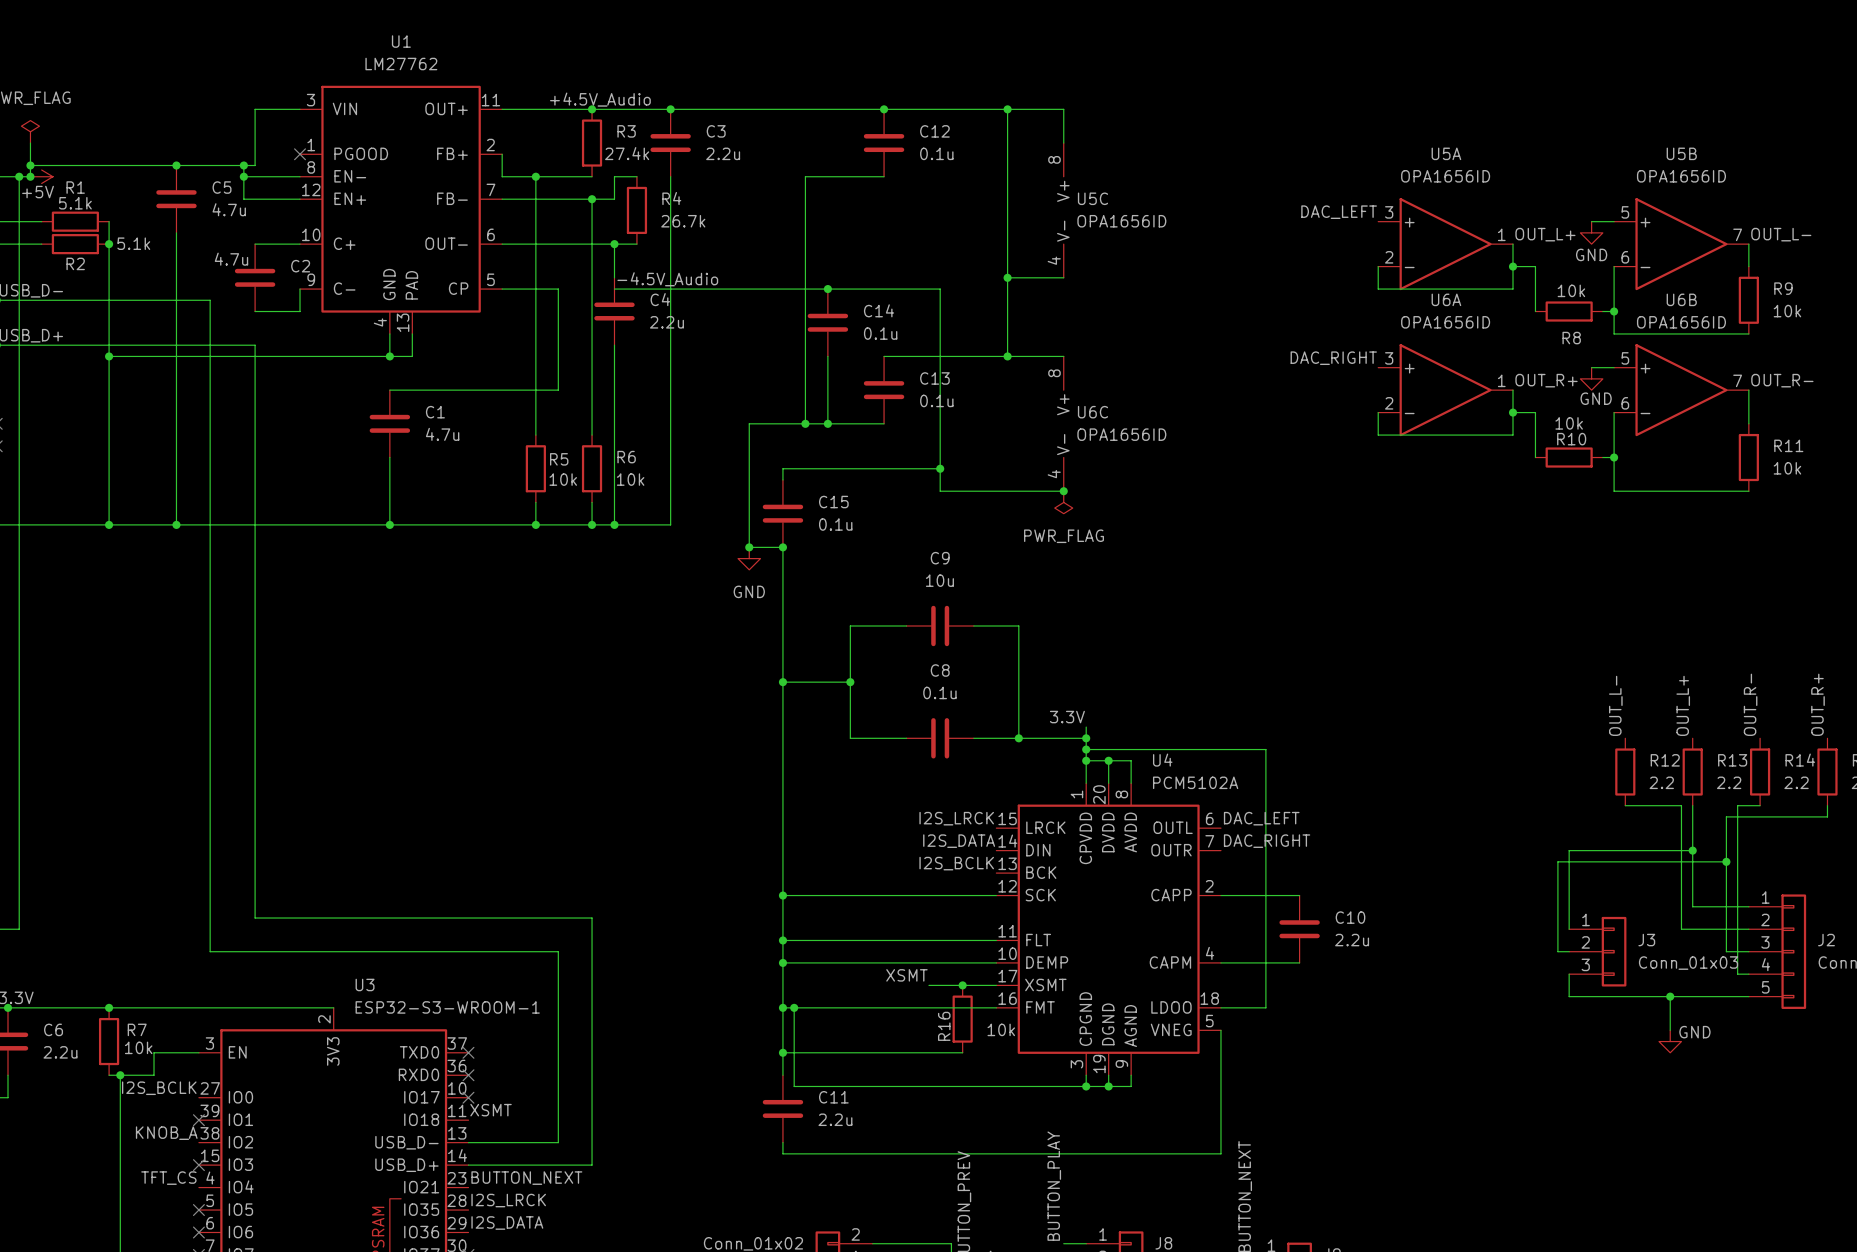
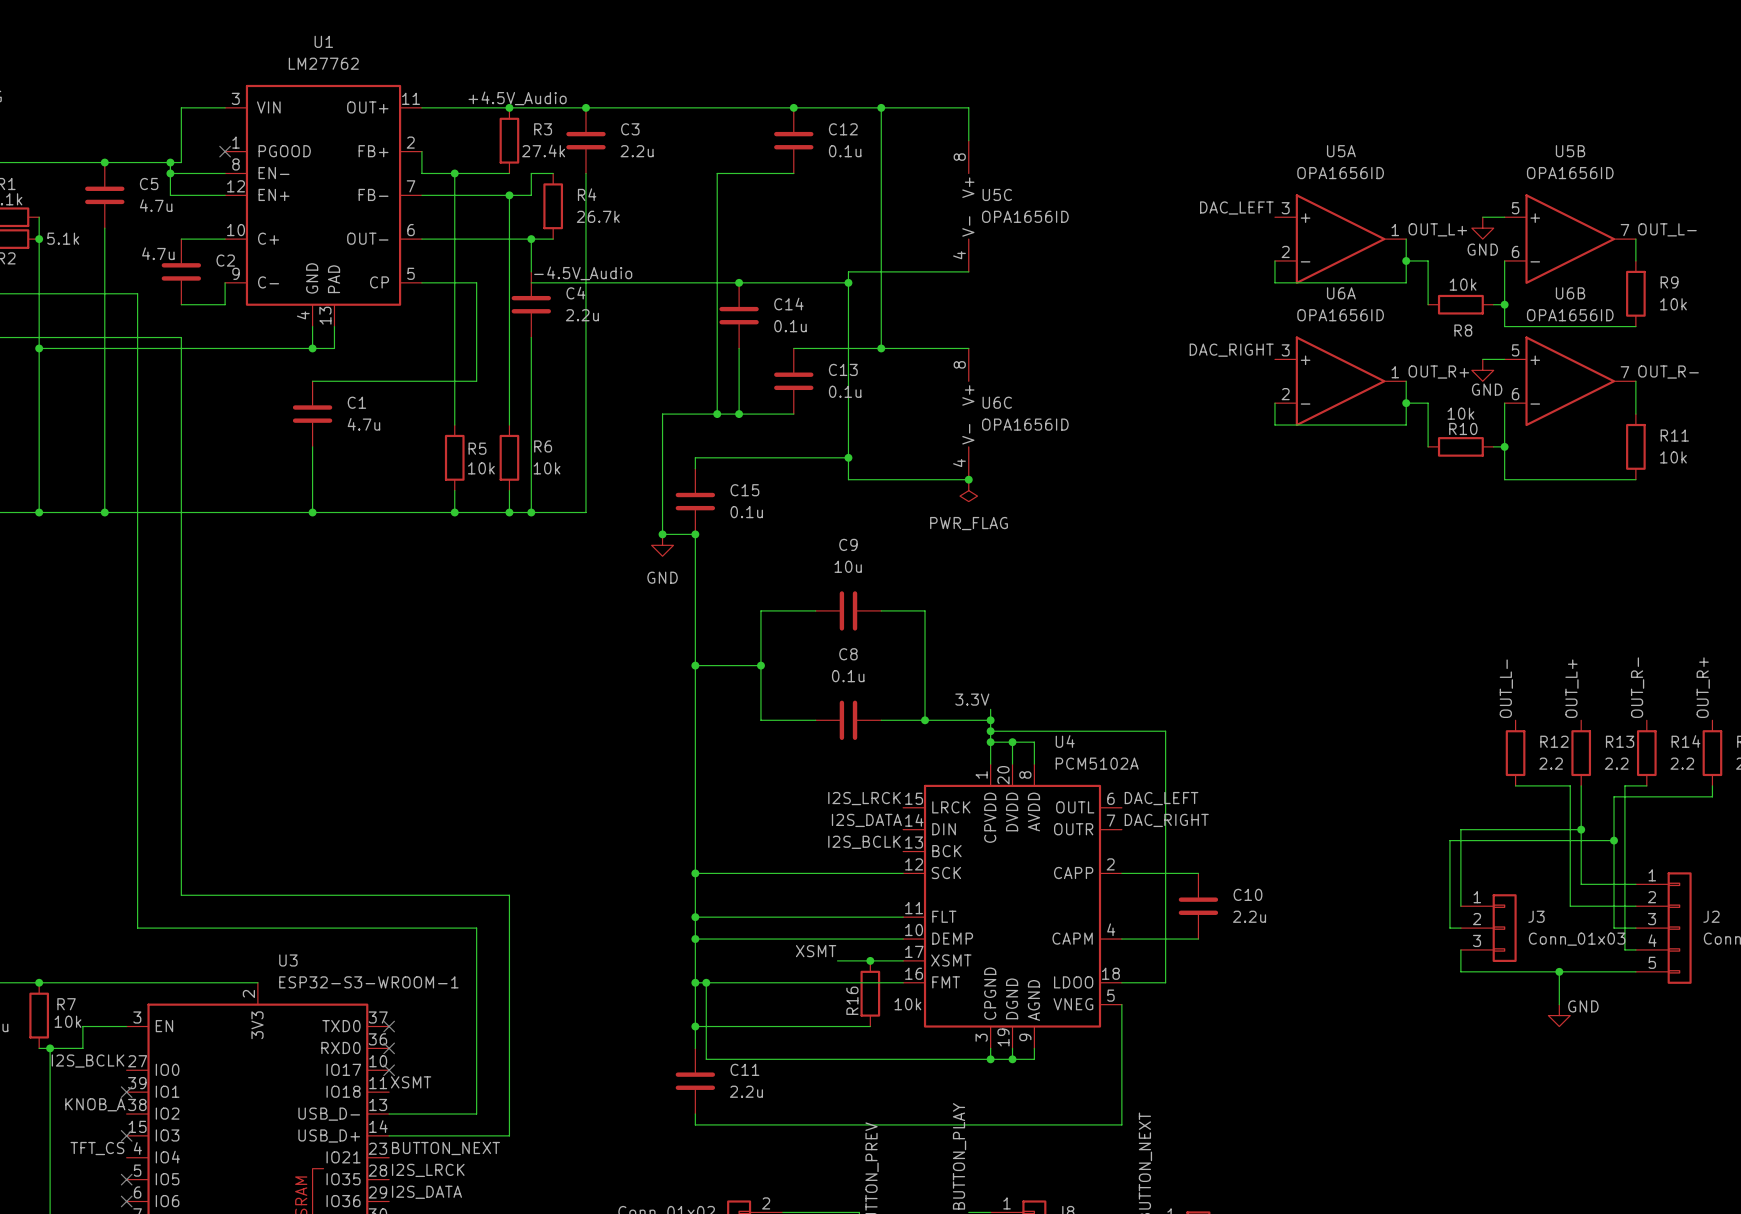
wire: (1007, 109) (1007, 356) -> (881, 107) (881, 348)
junction position: (1007, 109) -> (881, 107)
wire: none -> (914, 271) (848, 271) (848, 282)
junction: (1007, 277) -> none
junction: none -> (848, 282)
junction position: (1007, 356) -> (881, 348)

